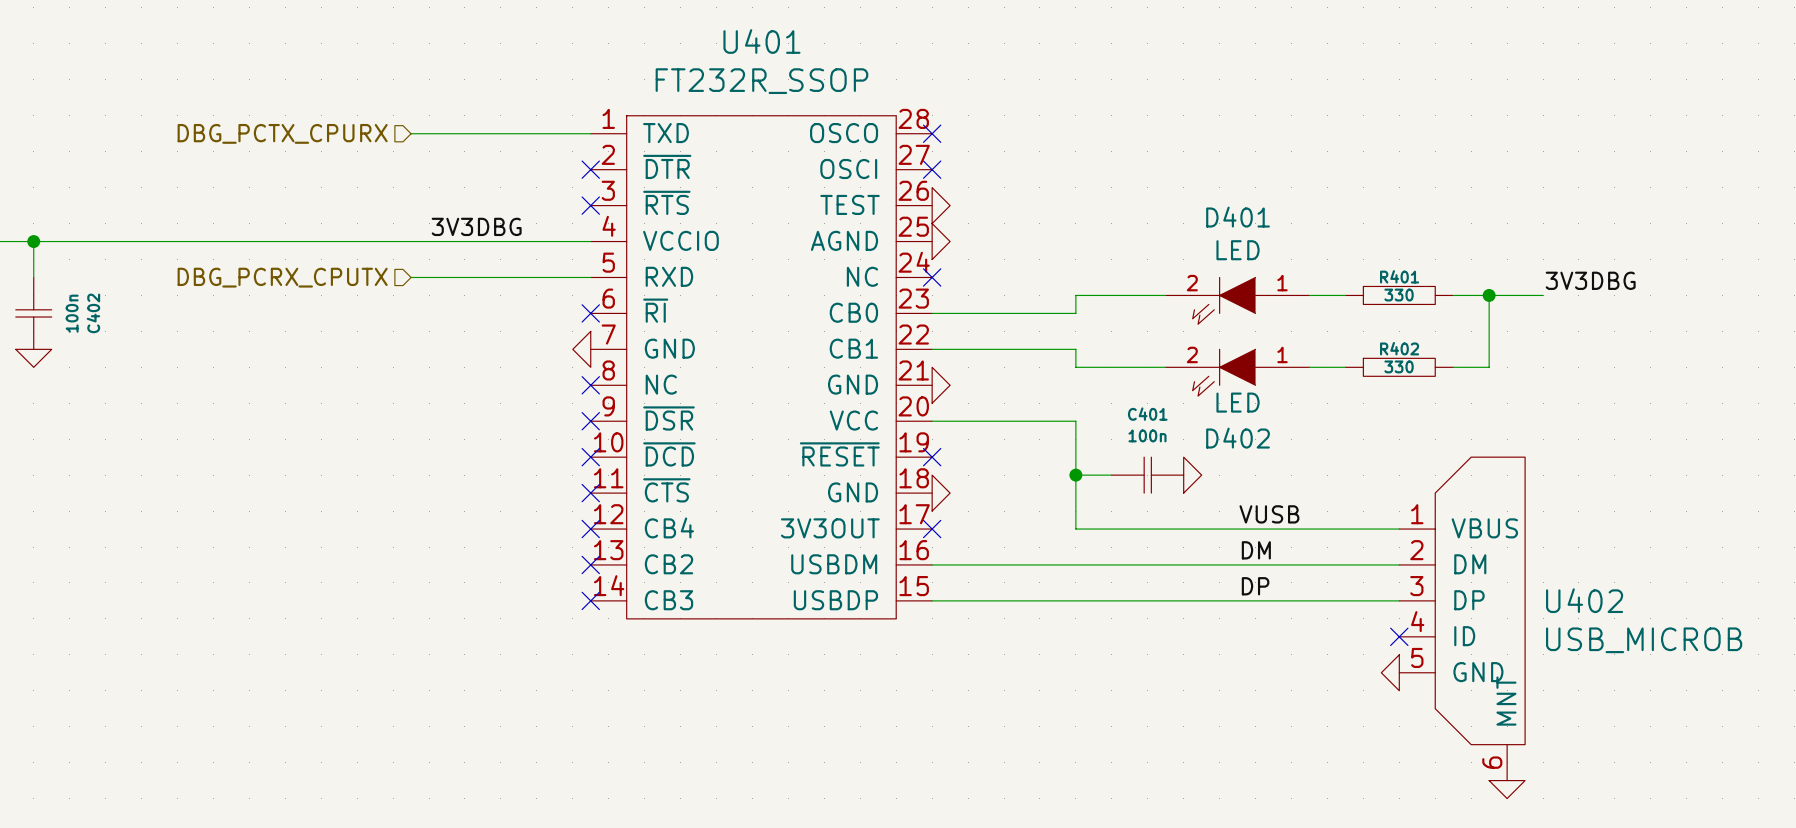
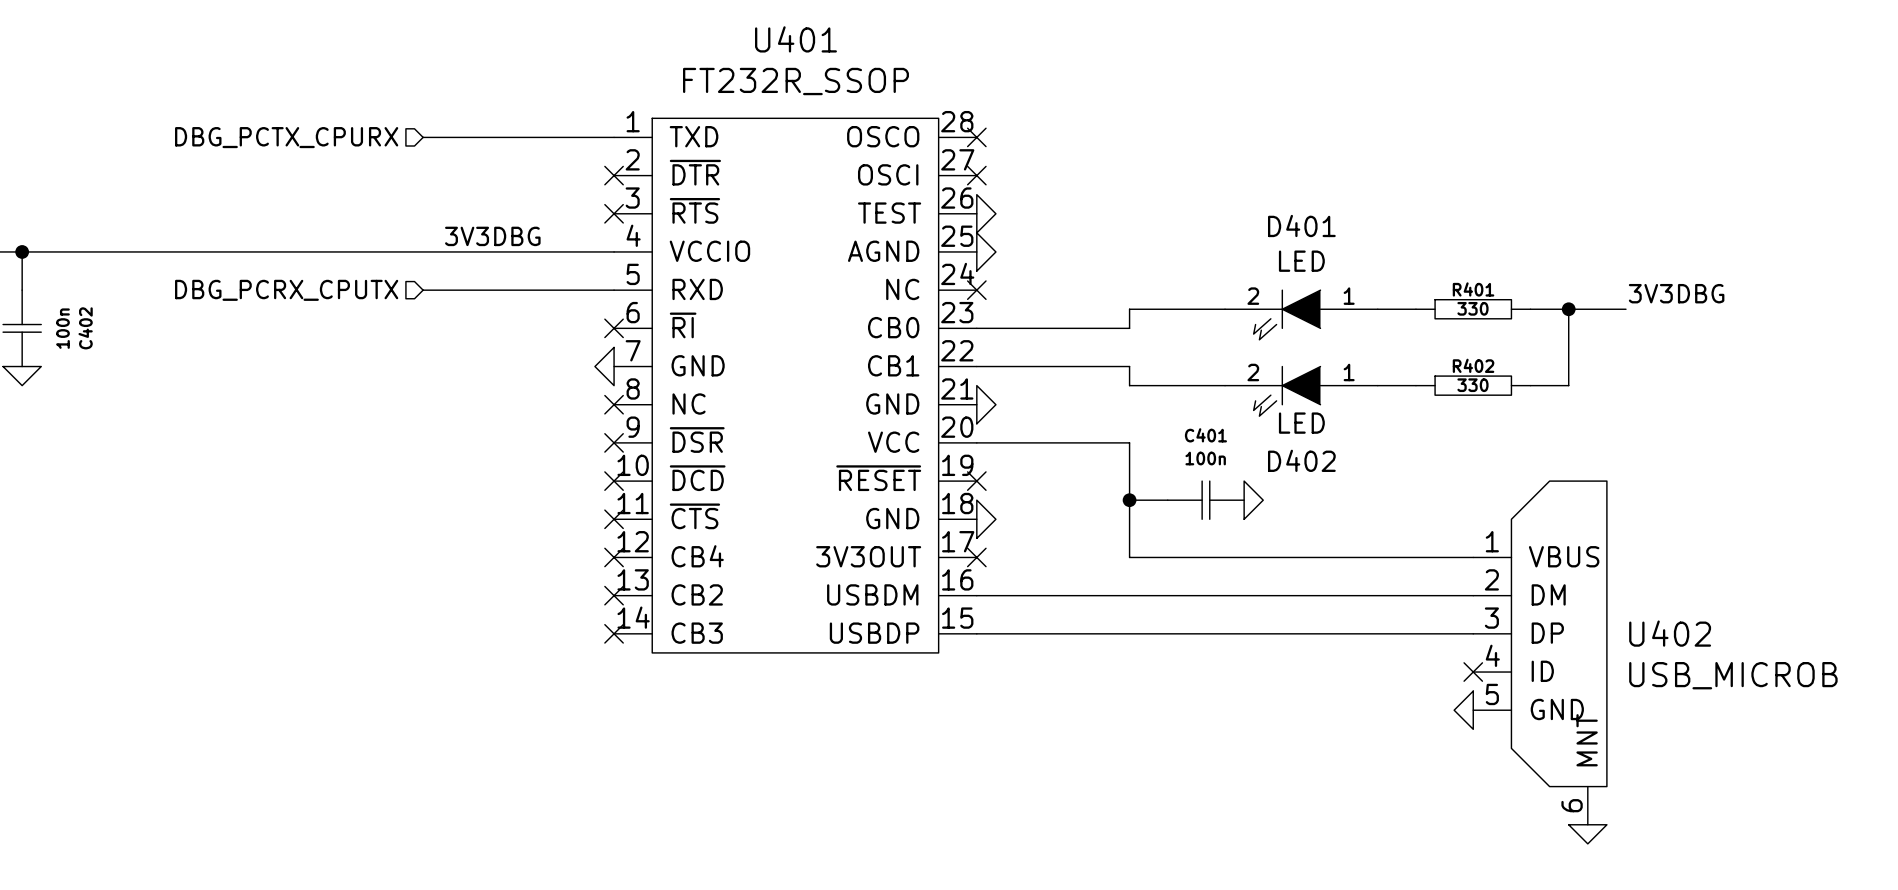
label: VUSB (1269, 514) -> none
label: DM (1256, 550) -> none
label: DP (1255, 586) -> none

